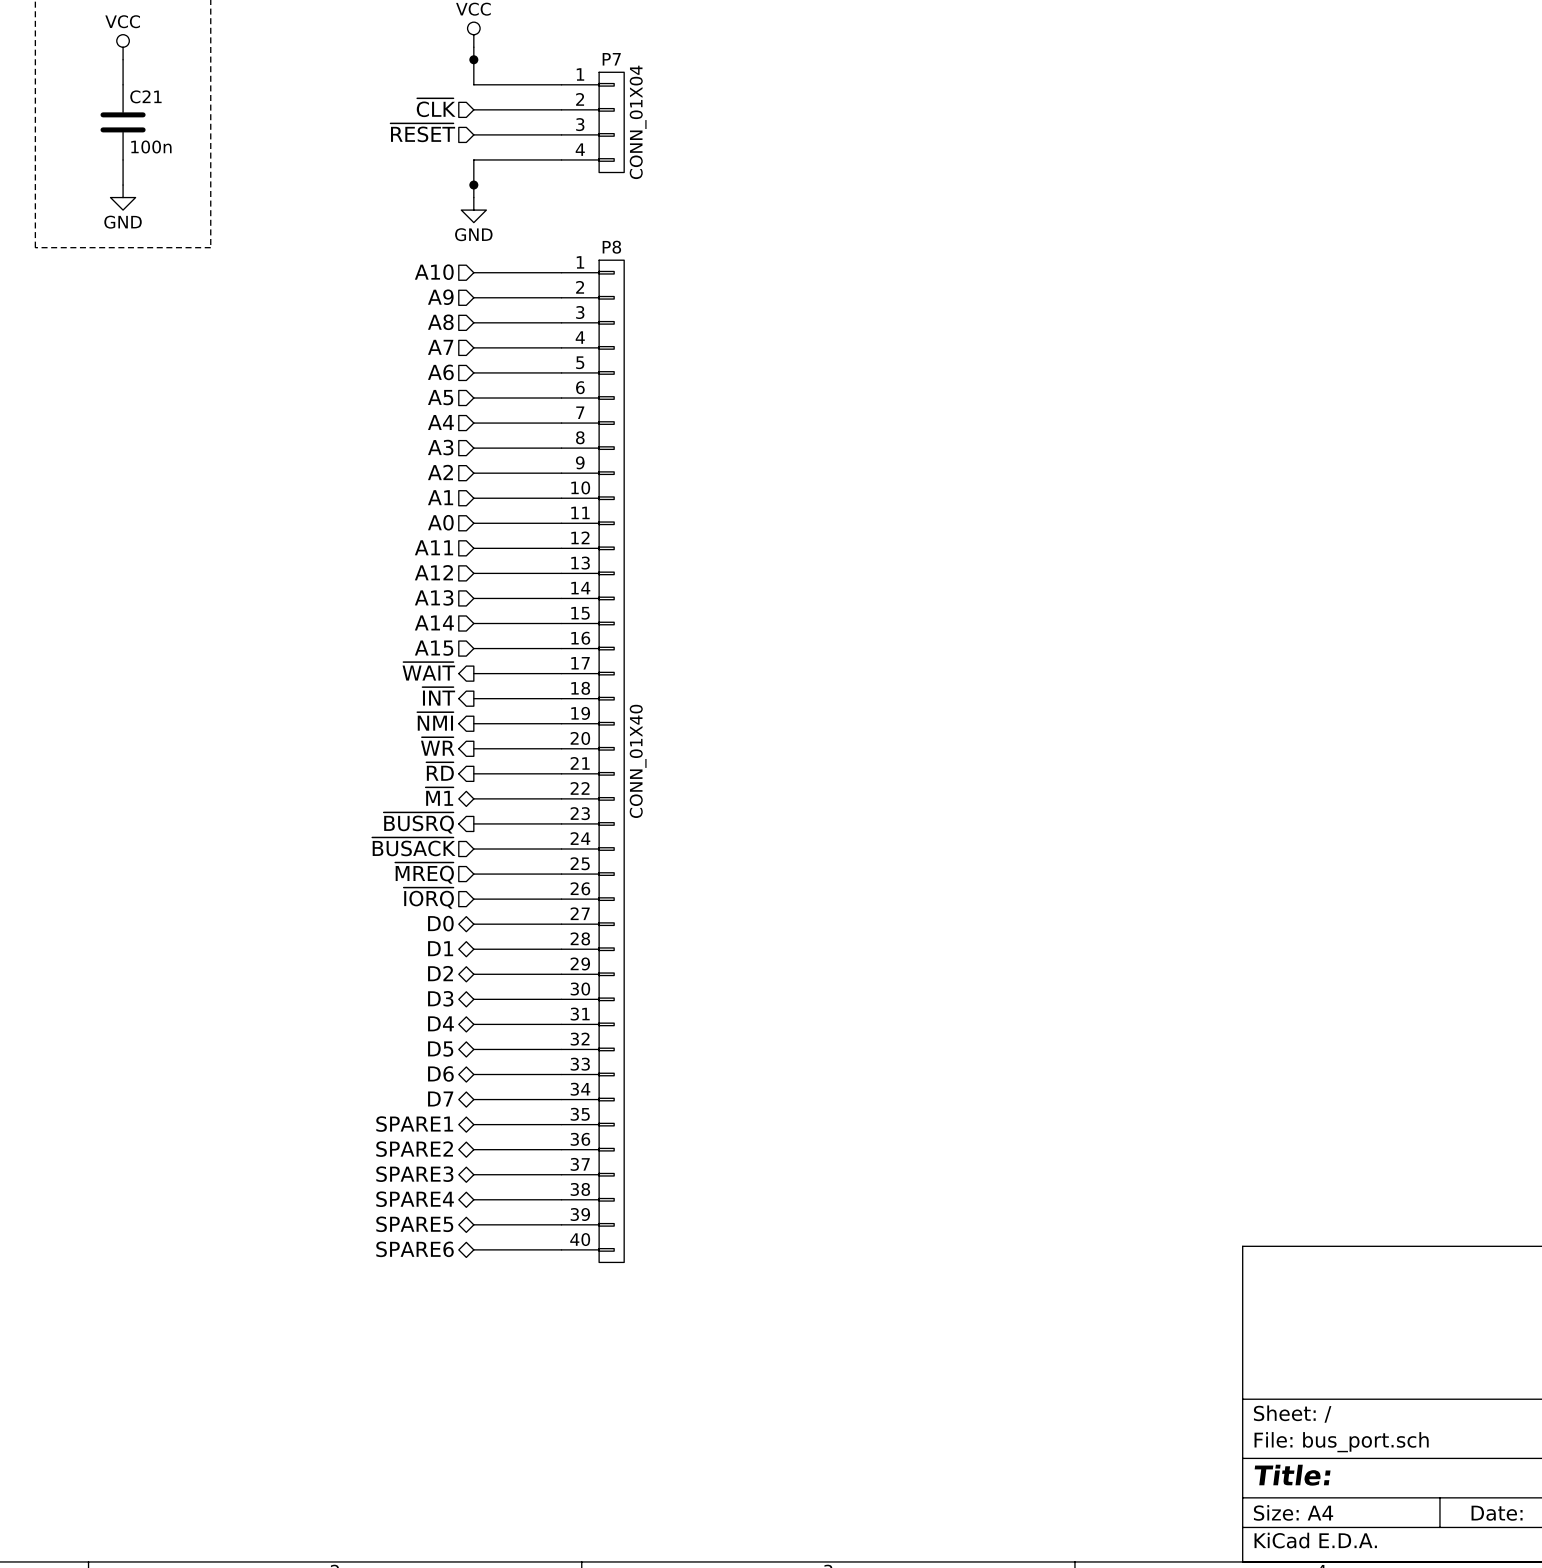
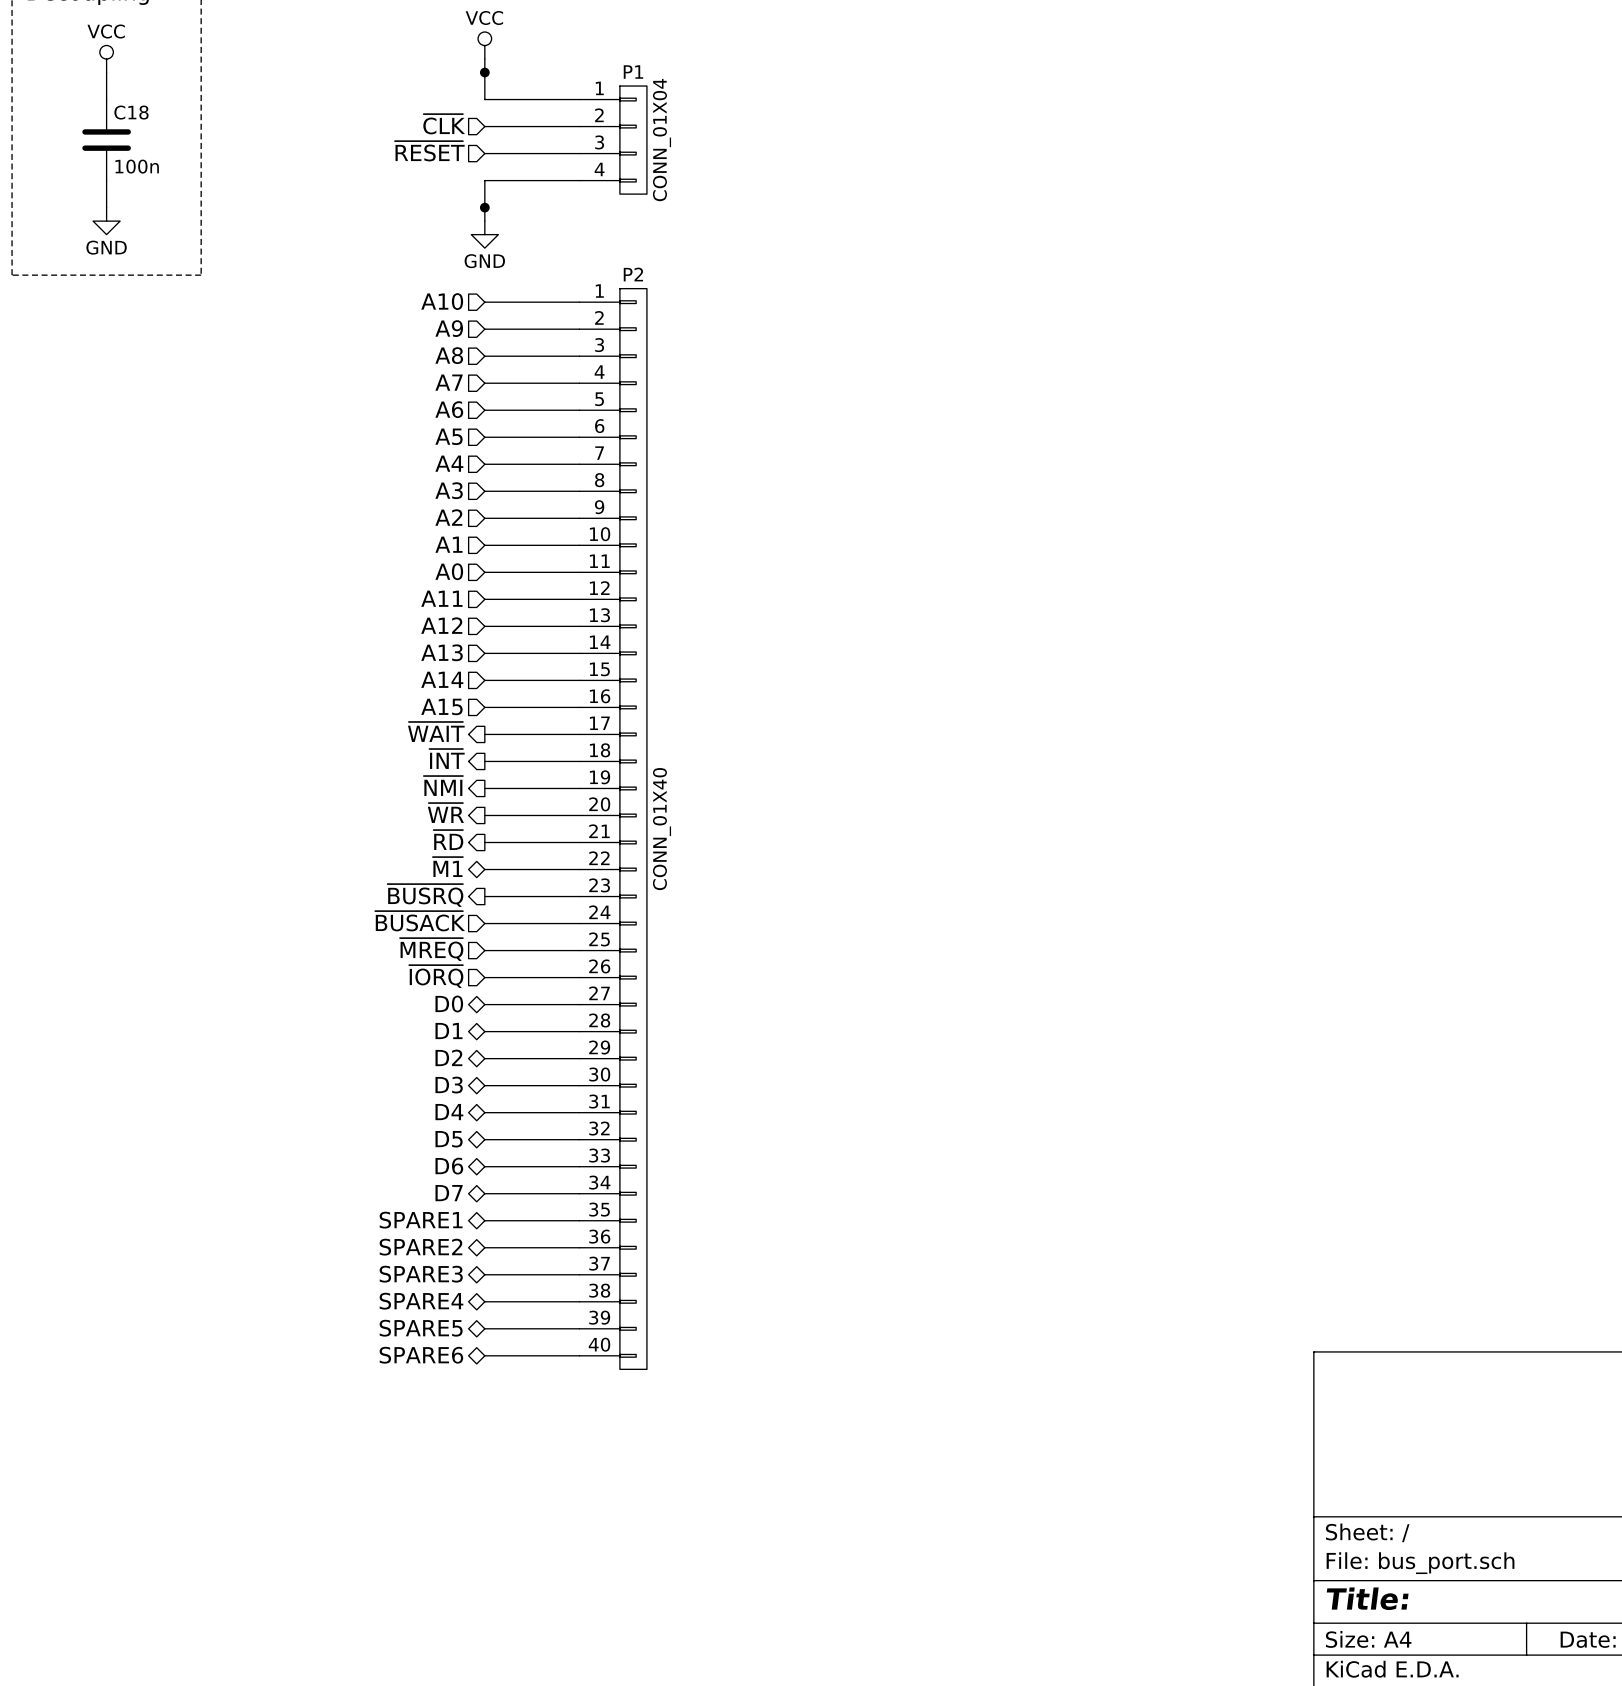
P7 name: P7 (611, 59) -> P1 (633, 72)
C21 name: C21 (145, 96) -> C18 (131, 112)
P8 name: P8 (611, 247) -> P2 (633, 274)

